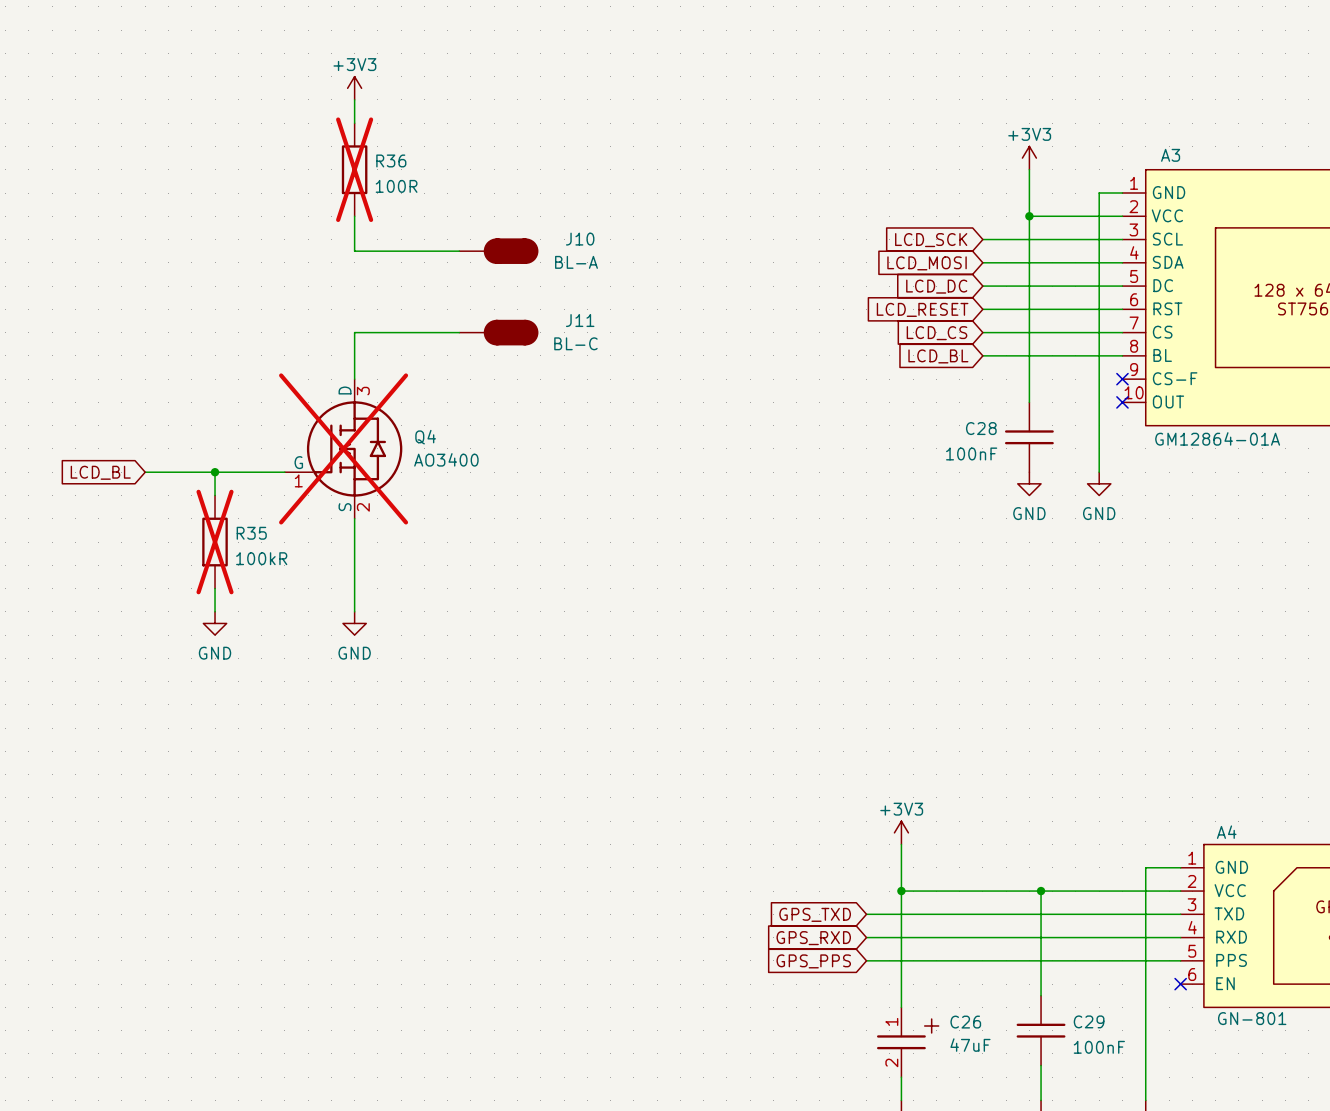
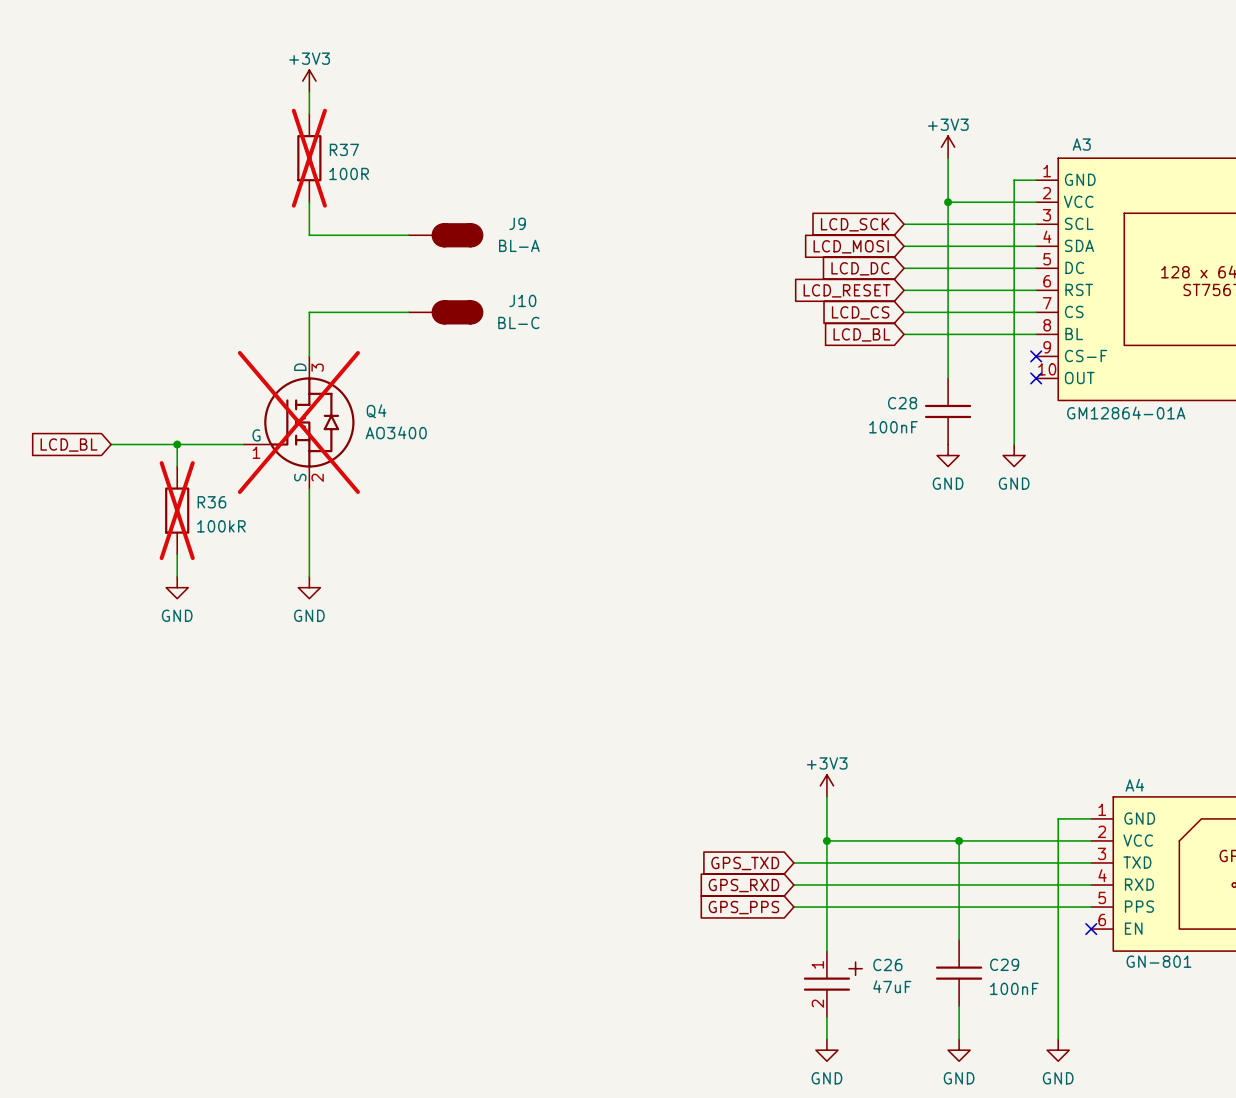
R36 name: R36 (391, 160) -> R37 (344, 149)
J10 name: J10 (580, 239) -> J9 (517, 223)
J11 name: J11 (580, 320) -> J10 (522, 300)
R35 name: R35 (251, 533) -> R36 (211, 502)

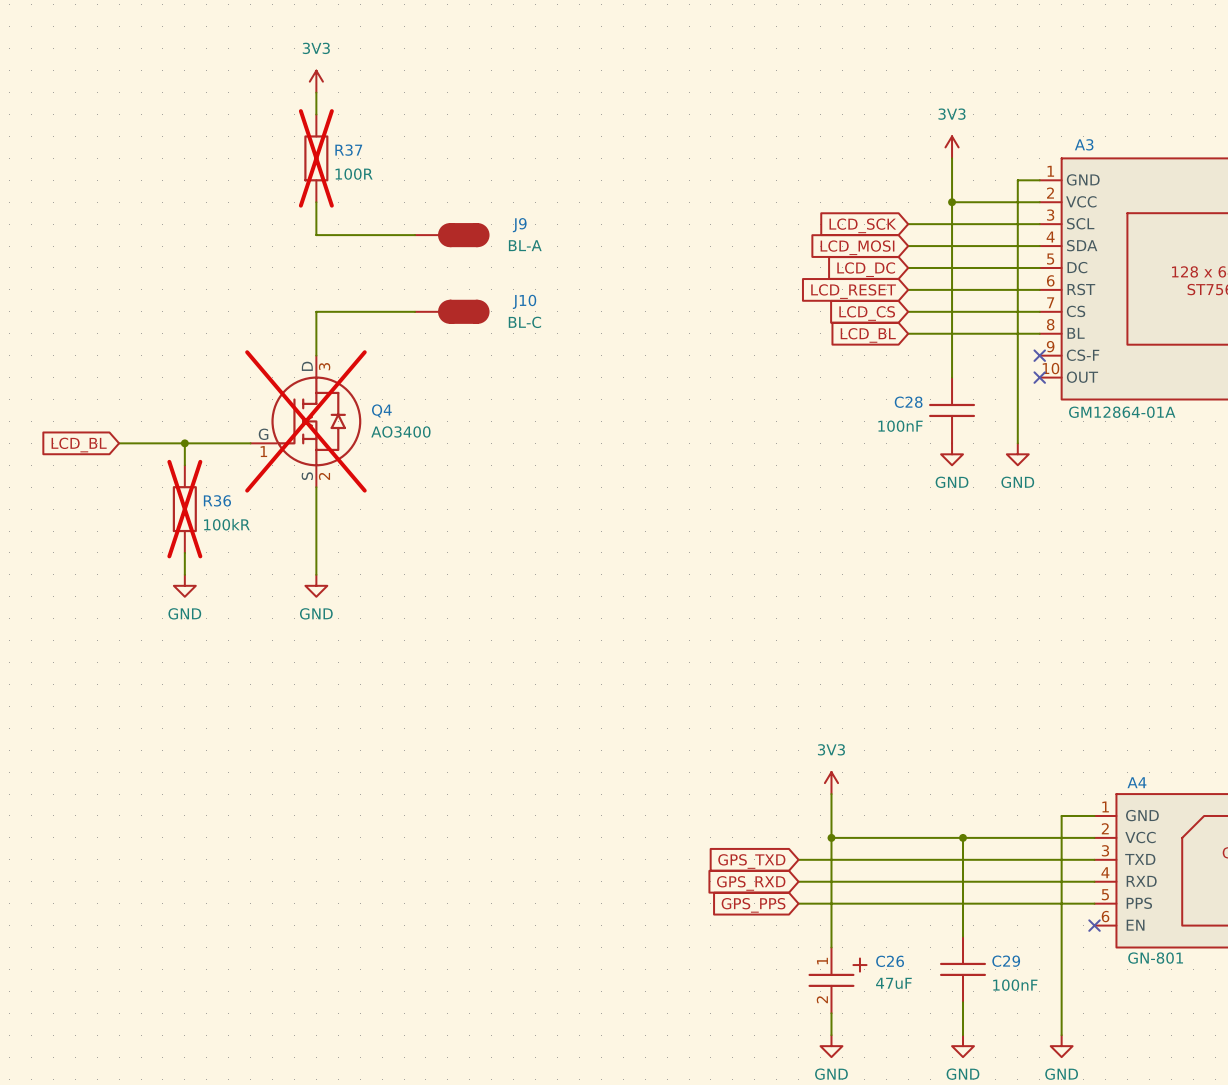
power symbol: +3V3 (309, 81) -> 3V3 (316, 81)
power symbol: +3V3 (948, 147) -> 3V3 (952, 147)
power symbol: +3V3 (826, 785) -> 3V3 (831, 783)

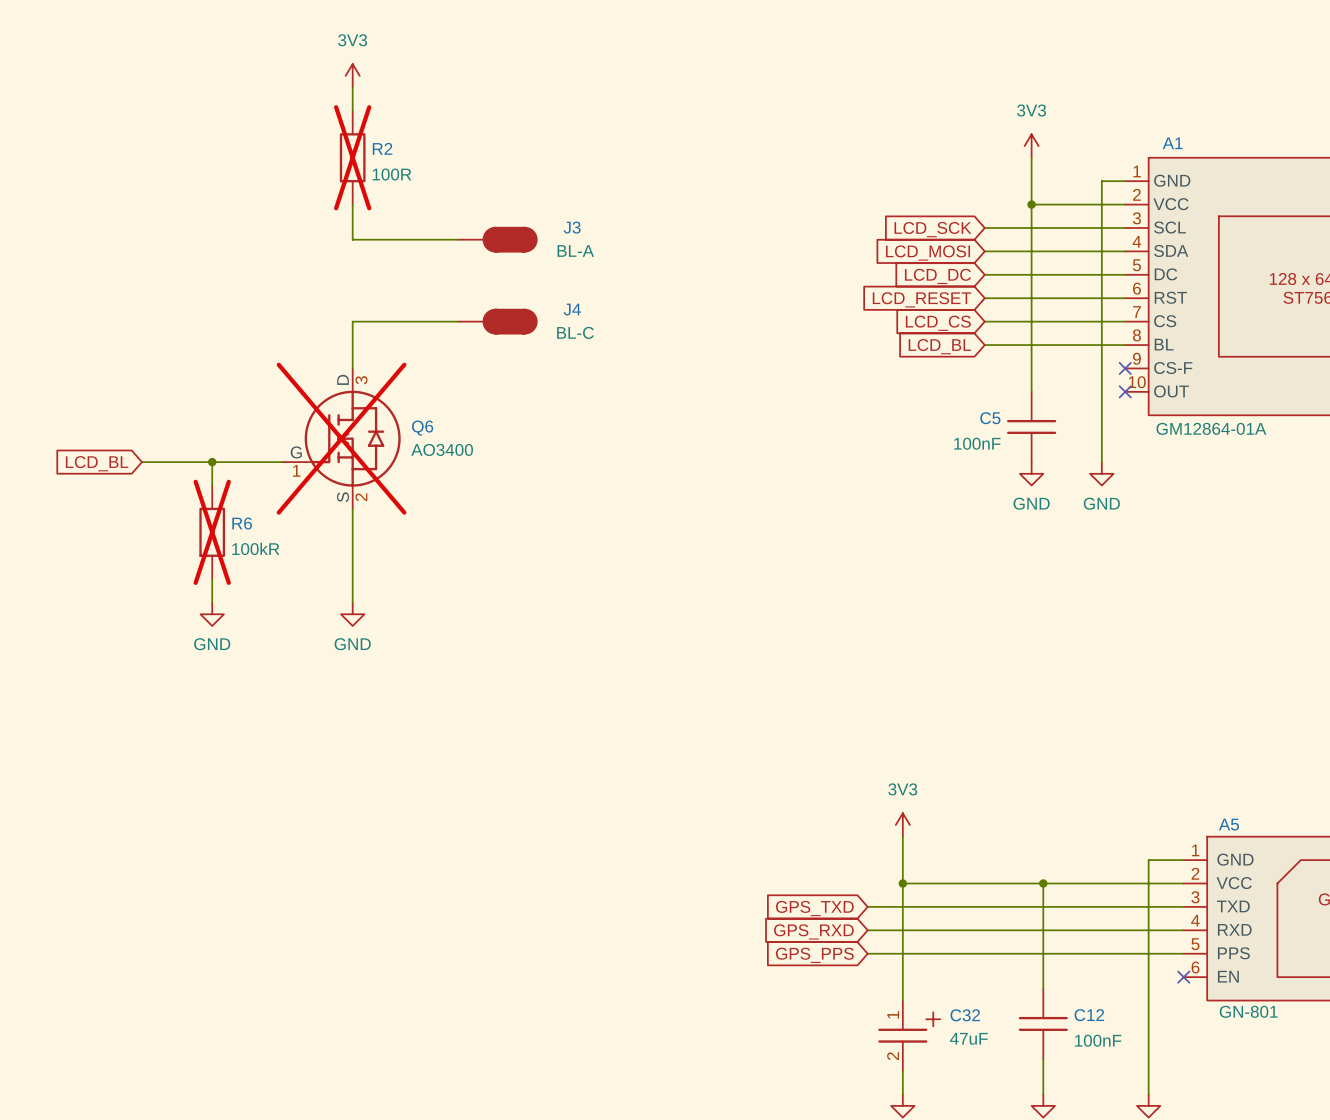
A3 name: A3 (1084, 144) -> A1 (1172, 143)
R37 name: R37 (348, 150) -> R2 (382, 148)
J9 name: J9 (519, 225) -> J3 (572, 227)
J10 name: J10 (524, 301) -> J4 (572, 309)
C28 name: C28 (908, 402) -> C5 (990, 418)
Q4 name: Q4 (381, 410) -> Q6 (422, 428)
R36 name: R36 (217, 500) -> R6 (242, 523)
A4 name: A4 (1136, 782) -> A5 (1228, 824)
C26 name: C26 (890, 961) -> C32 (965, 1015)
C29 name: C29 (1006, 961) -> C12 (1089, 1015)

